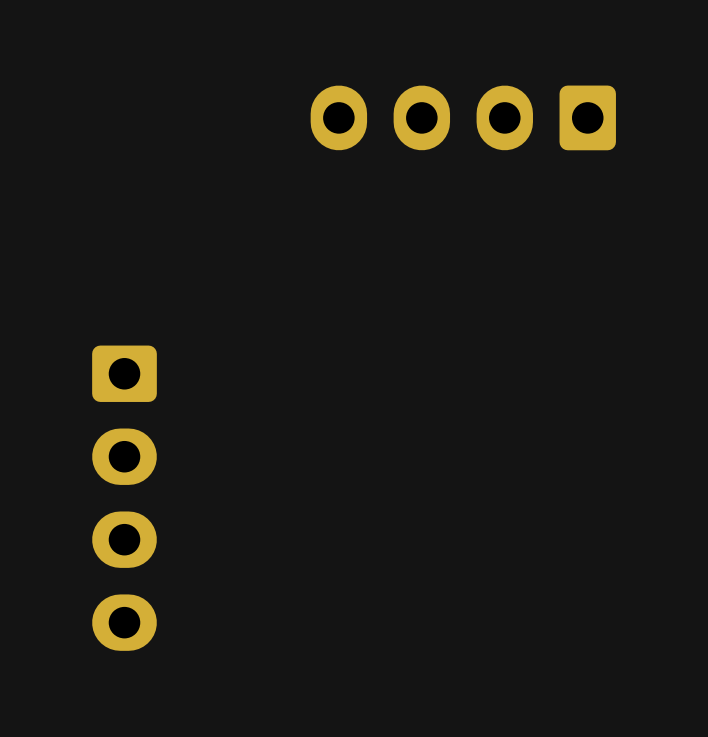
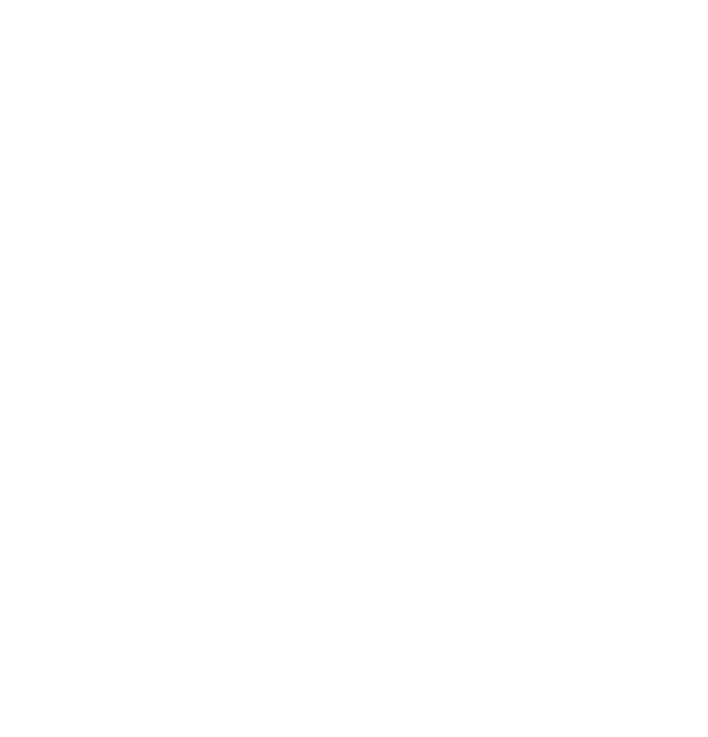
part: (463, 117) -> none
part: (124, 498) -> none

